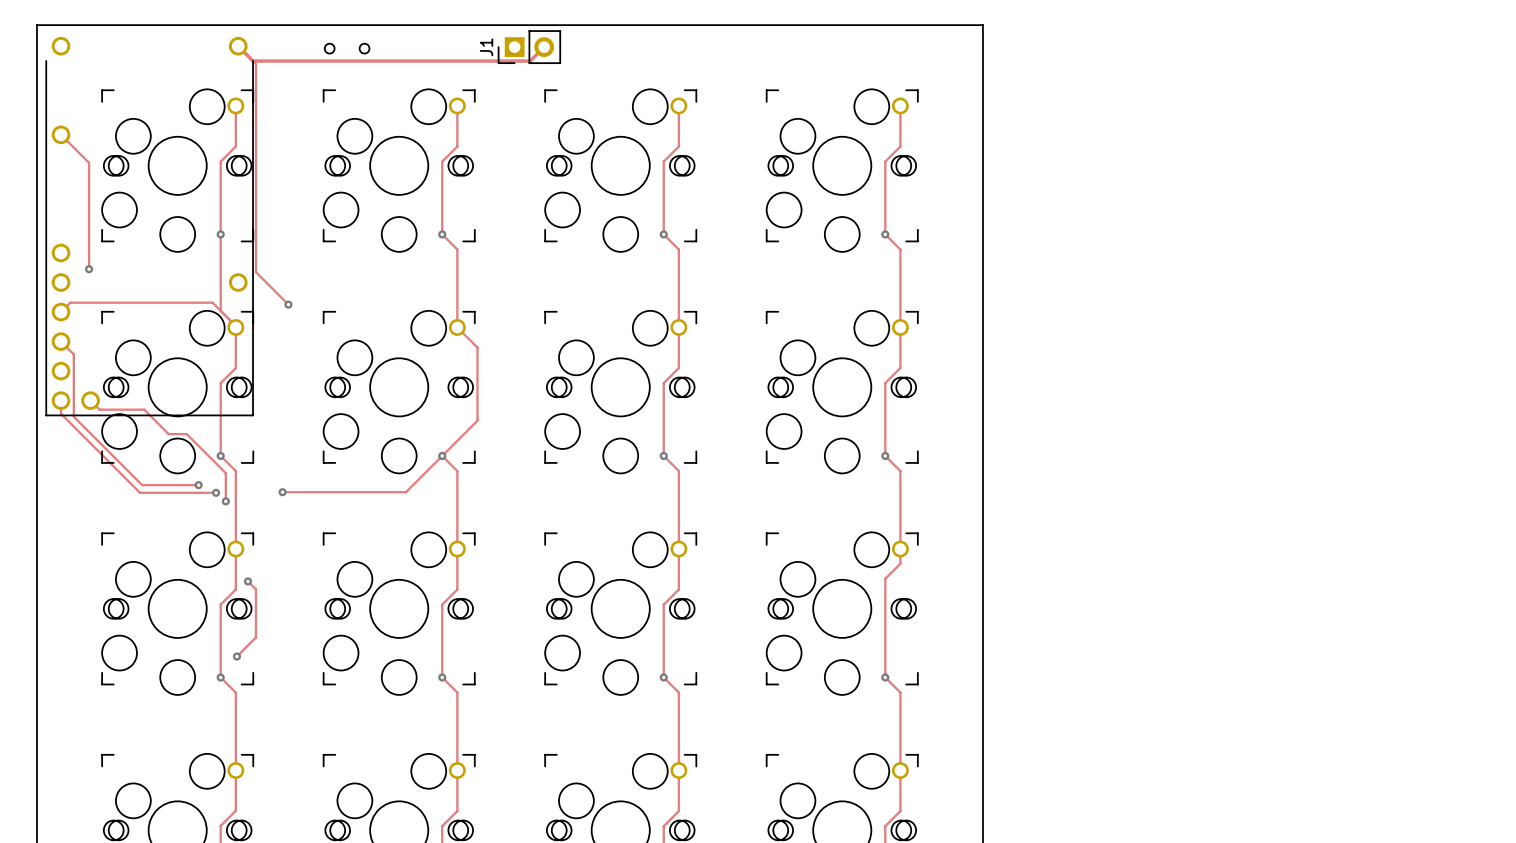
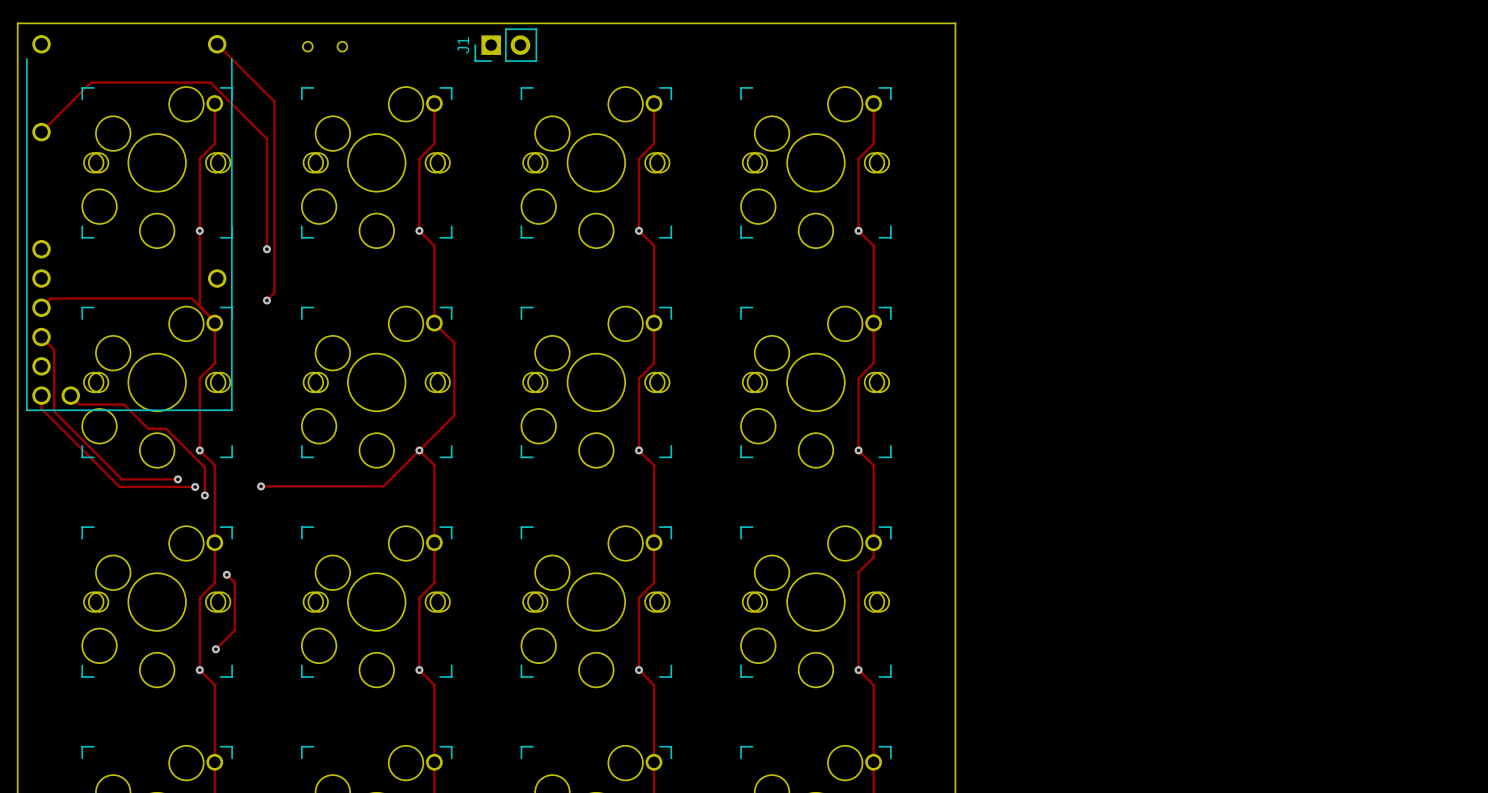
track: (238, 46) (253, 61) (530, 61) (544, 47) -> none
track: (255, 63) (255, 272) (288, 304) -> (234, 61) (274, 101) (274, 292) (266, 300)
track: (61, 134) (89, 162) (89, 269) -> (41, 132) (91, 82) (210, 82) (266, 138) (266, 249)
via: none -> (266, 249)
via: (89, 269) -> none

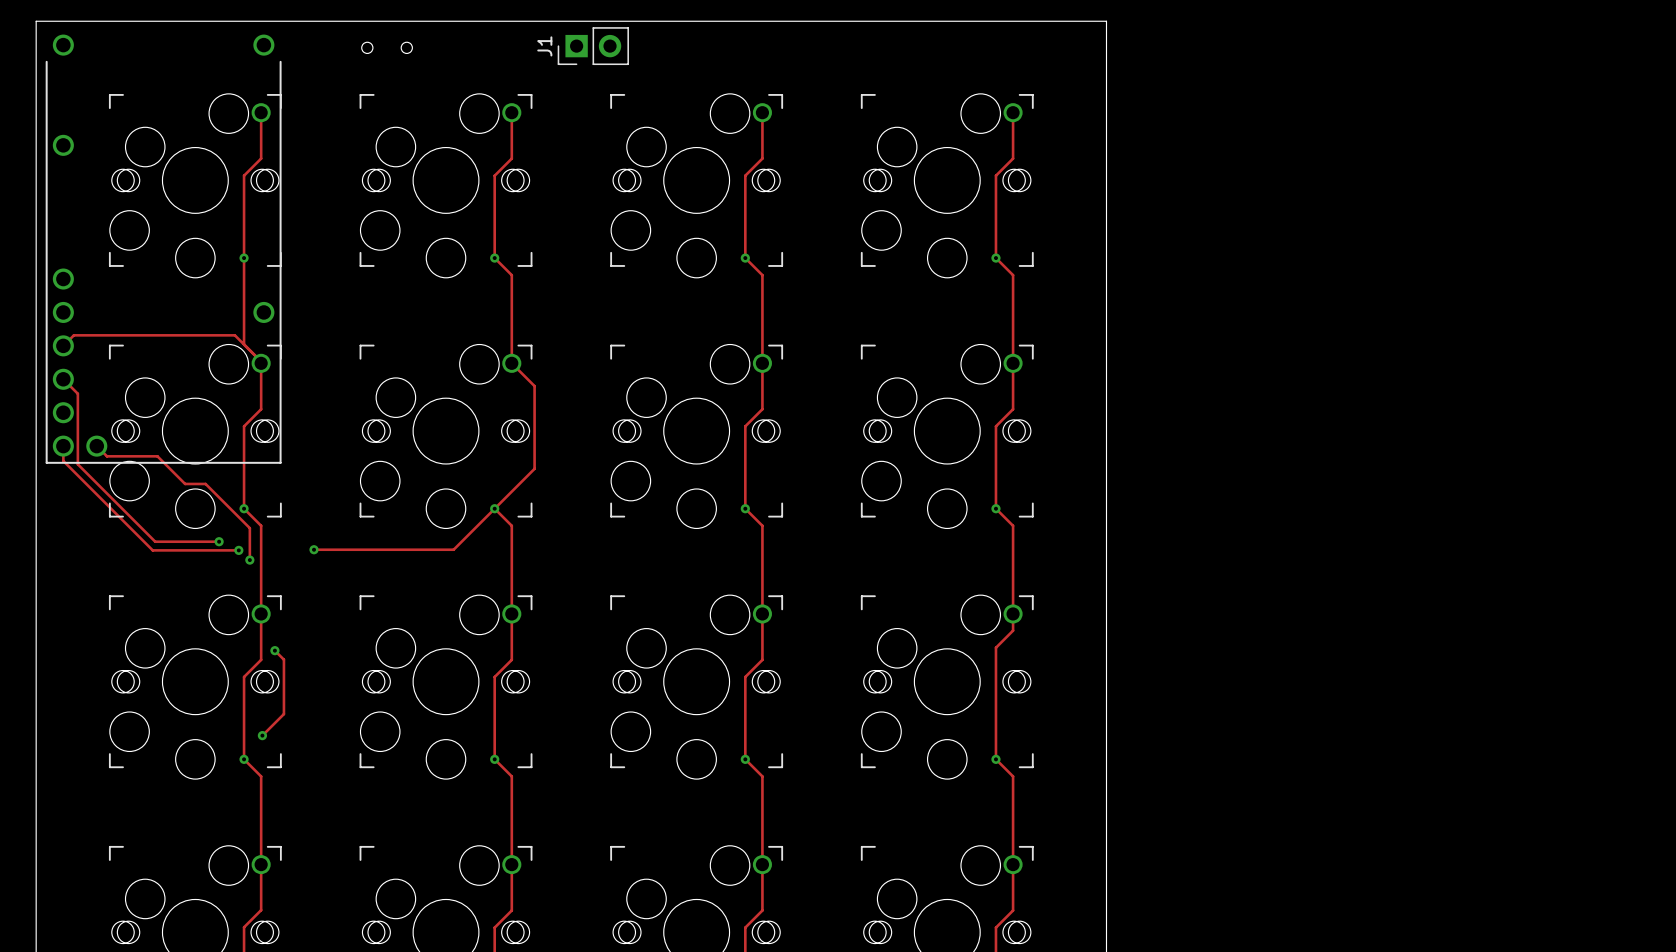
track: (217, 44) (274, 101) (274, 292) (266, 300) -> none
track: (41, 132) (91, 82) (210, 82) (266, 138) (266, 249) -> none
via: (266, 249) -> none
via: (266, 300) -> none

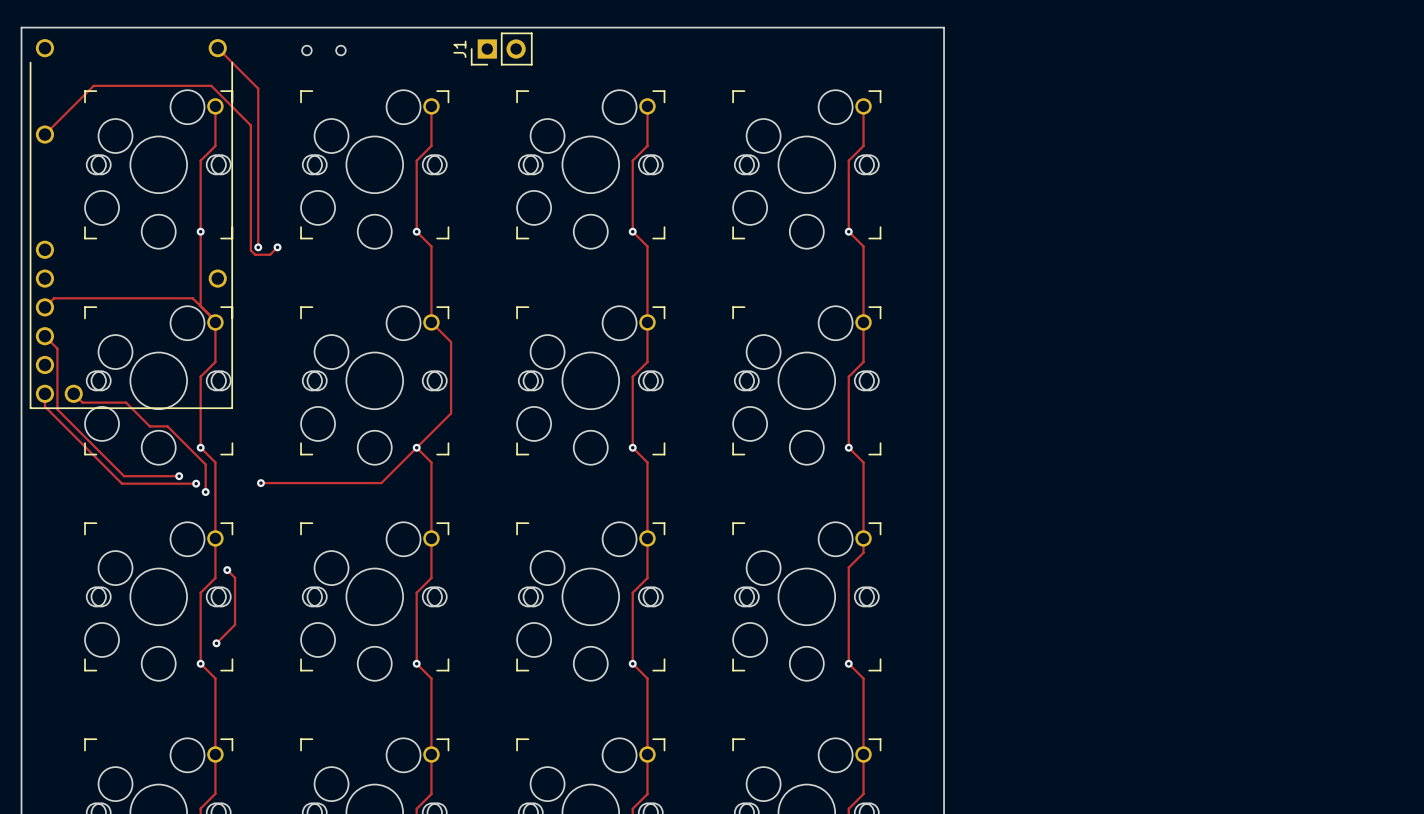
track: none -> (217, 48) (258, 88) (258, 247)
track: none -> (44, 134) (93, 85) (211, 85) (250, 125) (250, 250) (255, 254) (270, 254) (277, 247)
via: none -> (258, 247)
via: none -> (277, 247)

